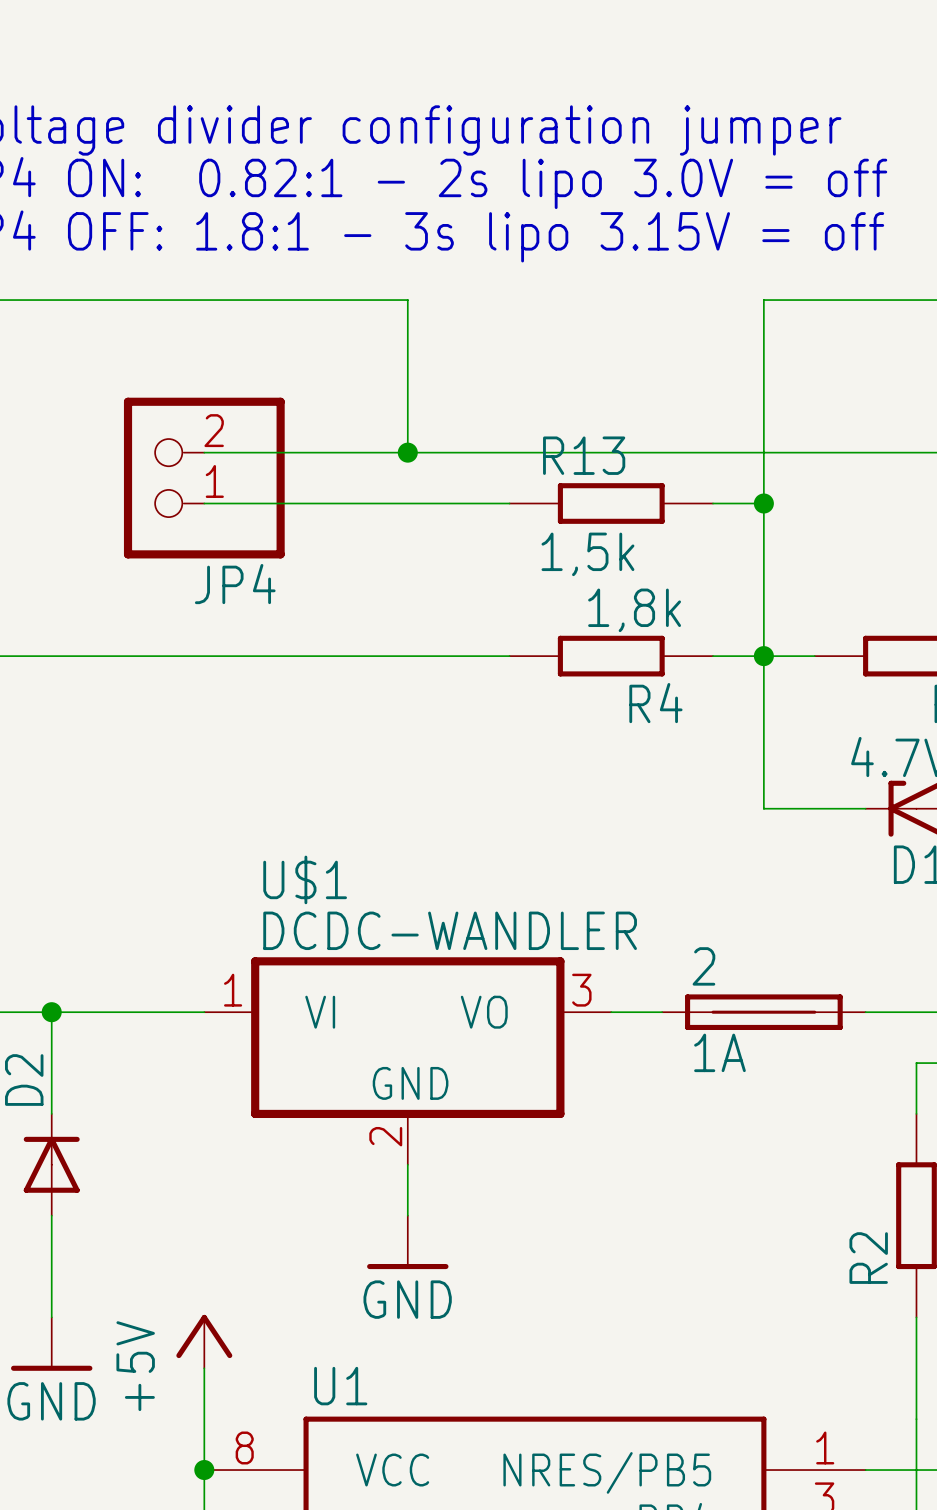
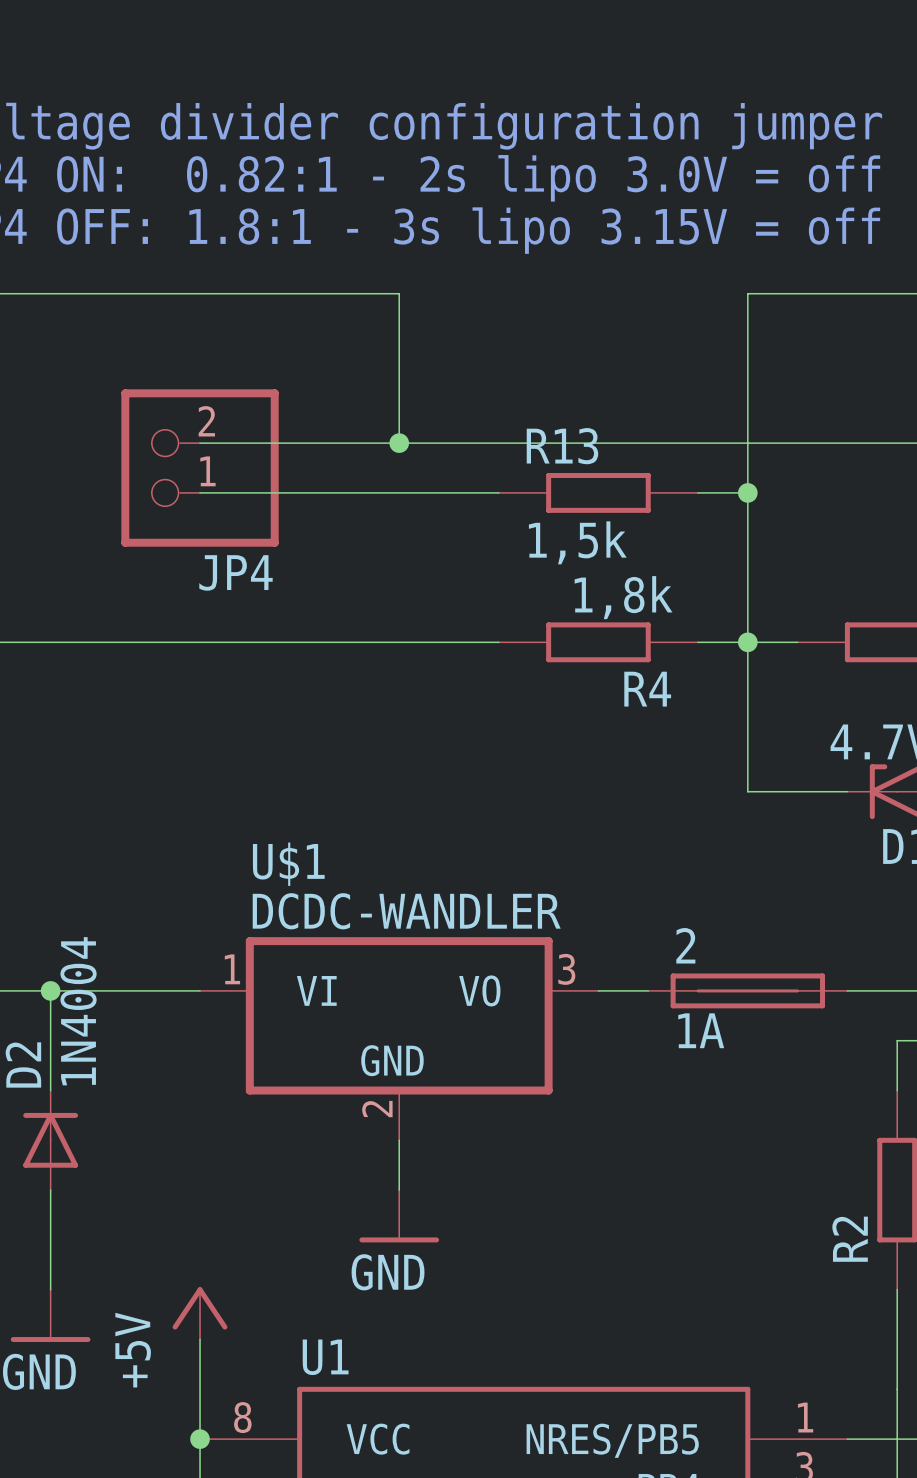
D2 value: none -> 1N4004 (78, 1011)

